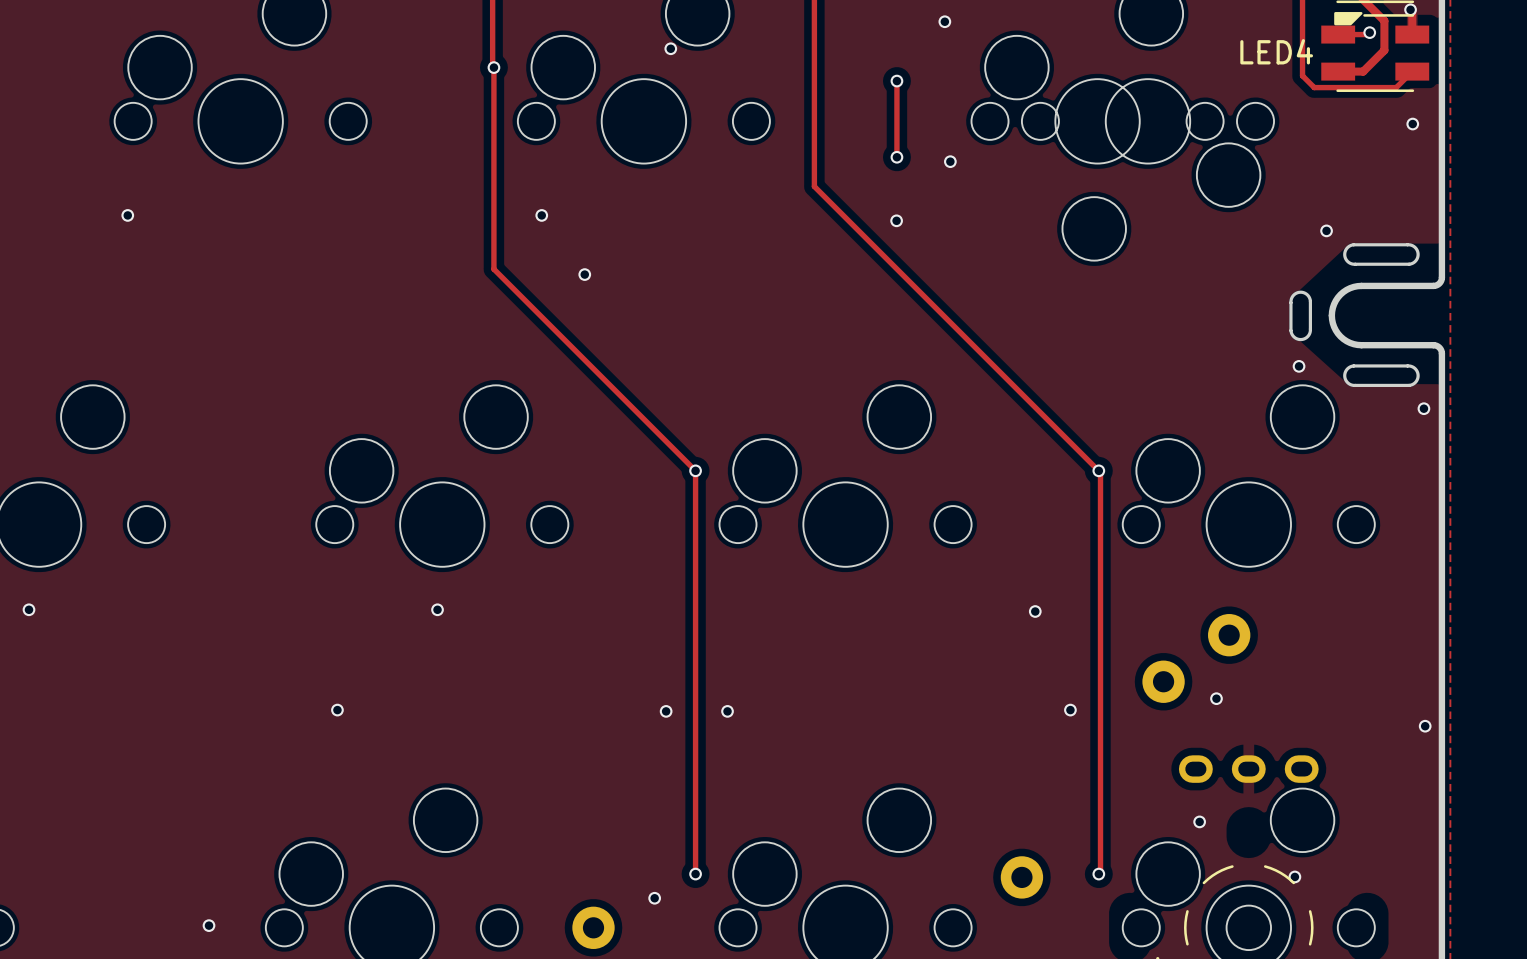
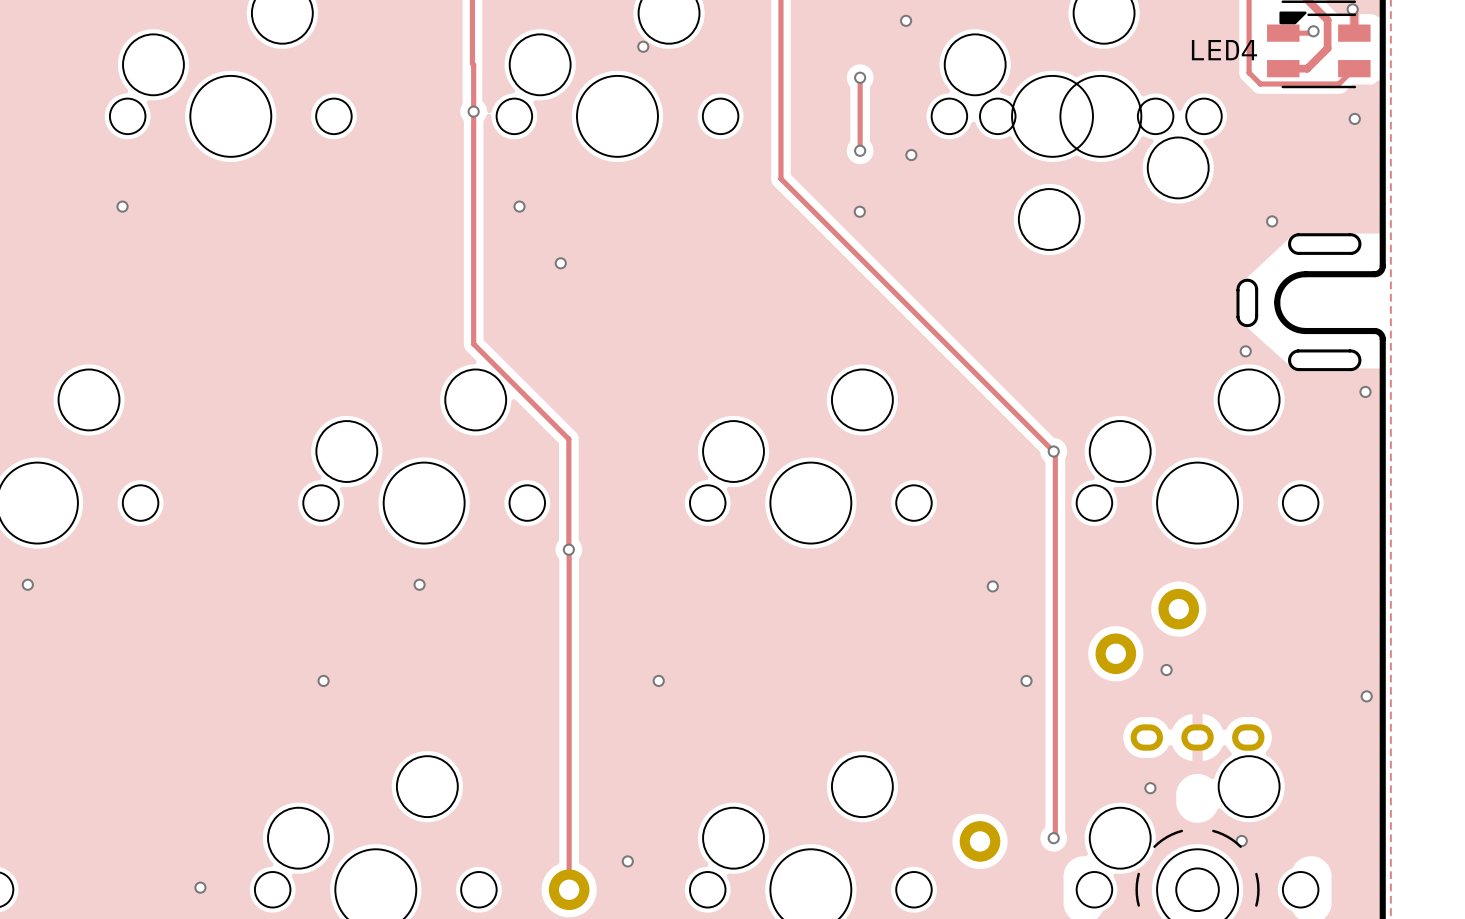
via position: (493, 67) -> (473, 111)
track: (493, 269) (695, 470) (695, 874) -> (473, 258) (473, 344) (568, 439) (569, 889)
via: (695, 470) -> none
via: none -> (568, 549)
via: none -> (658, 680)
via: (666, 711) -> none
via: (727, 711) -> none
via: (695, 874) -> none

